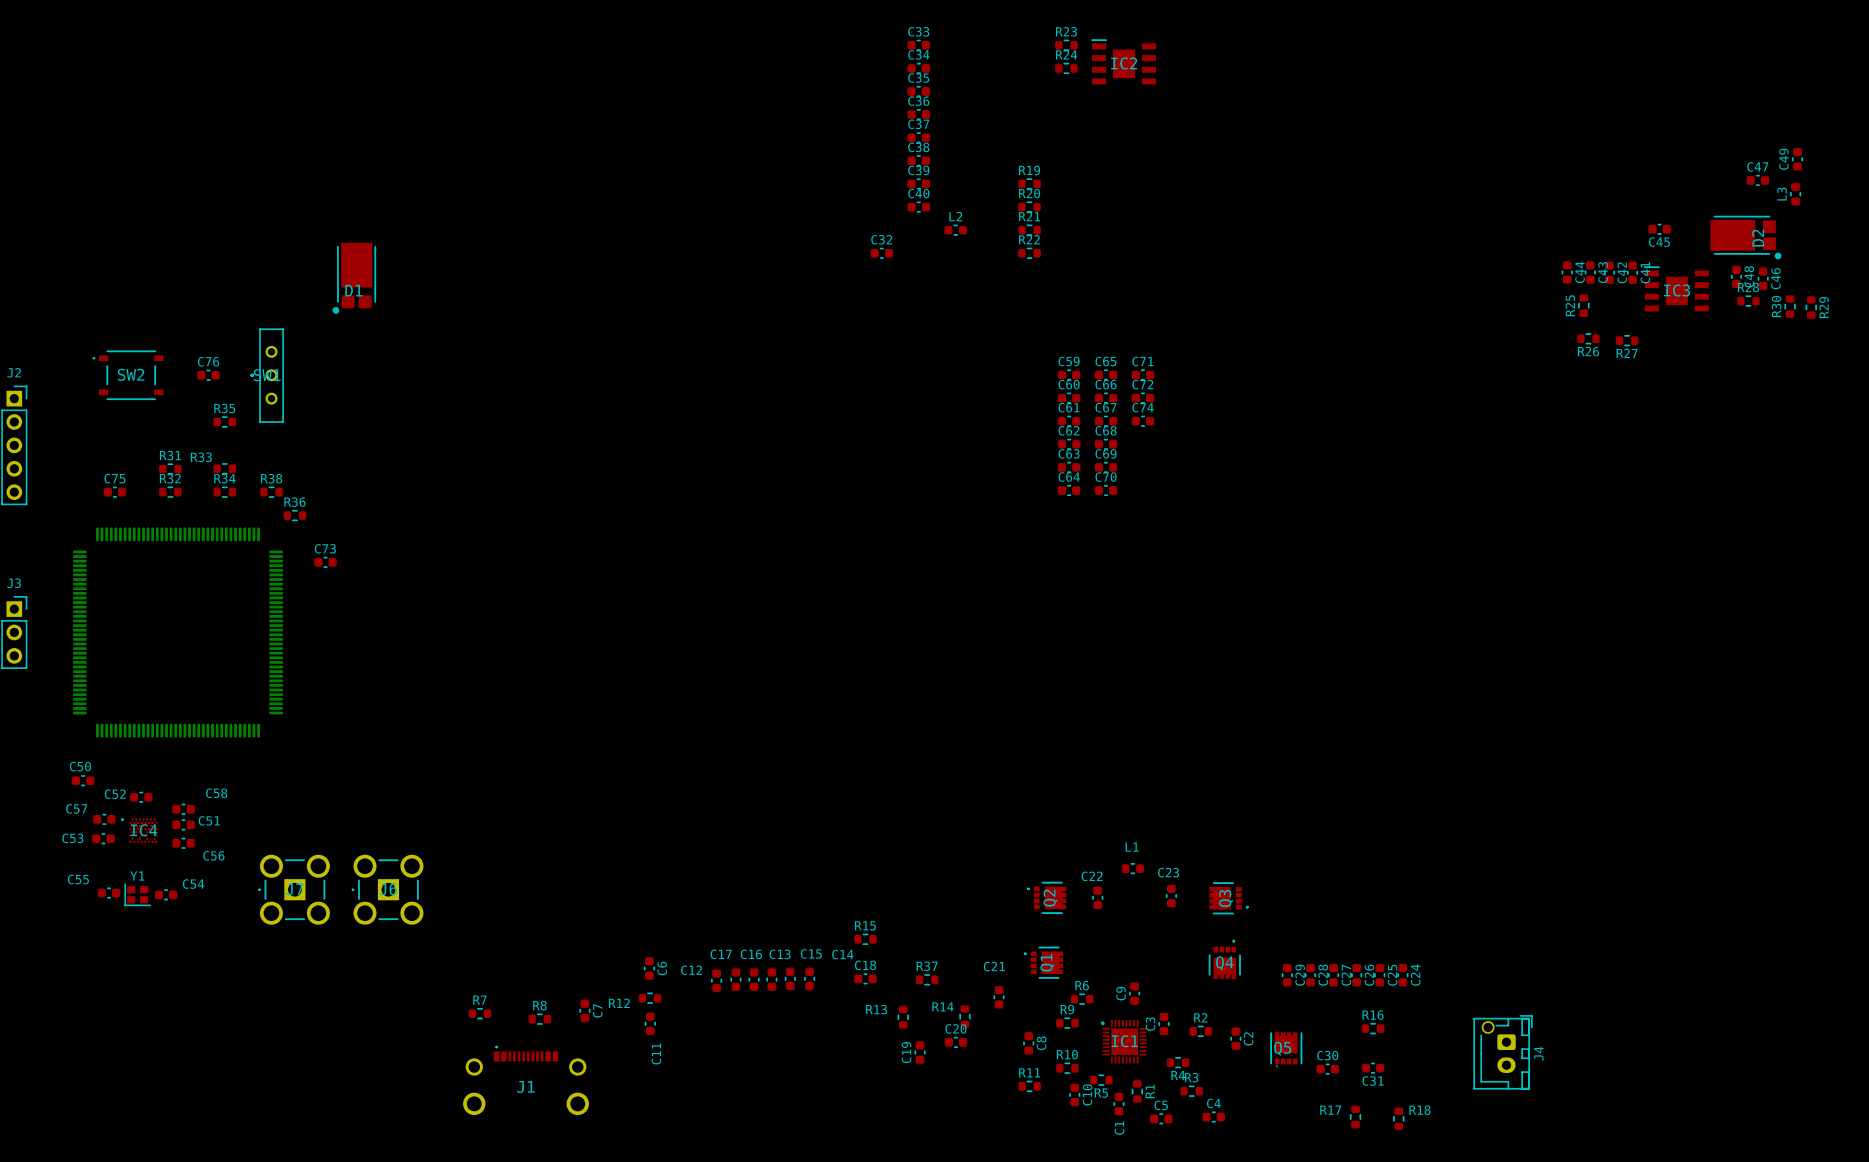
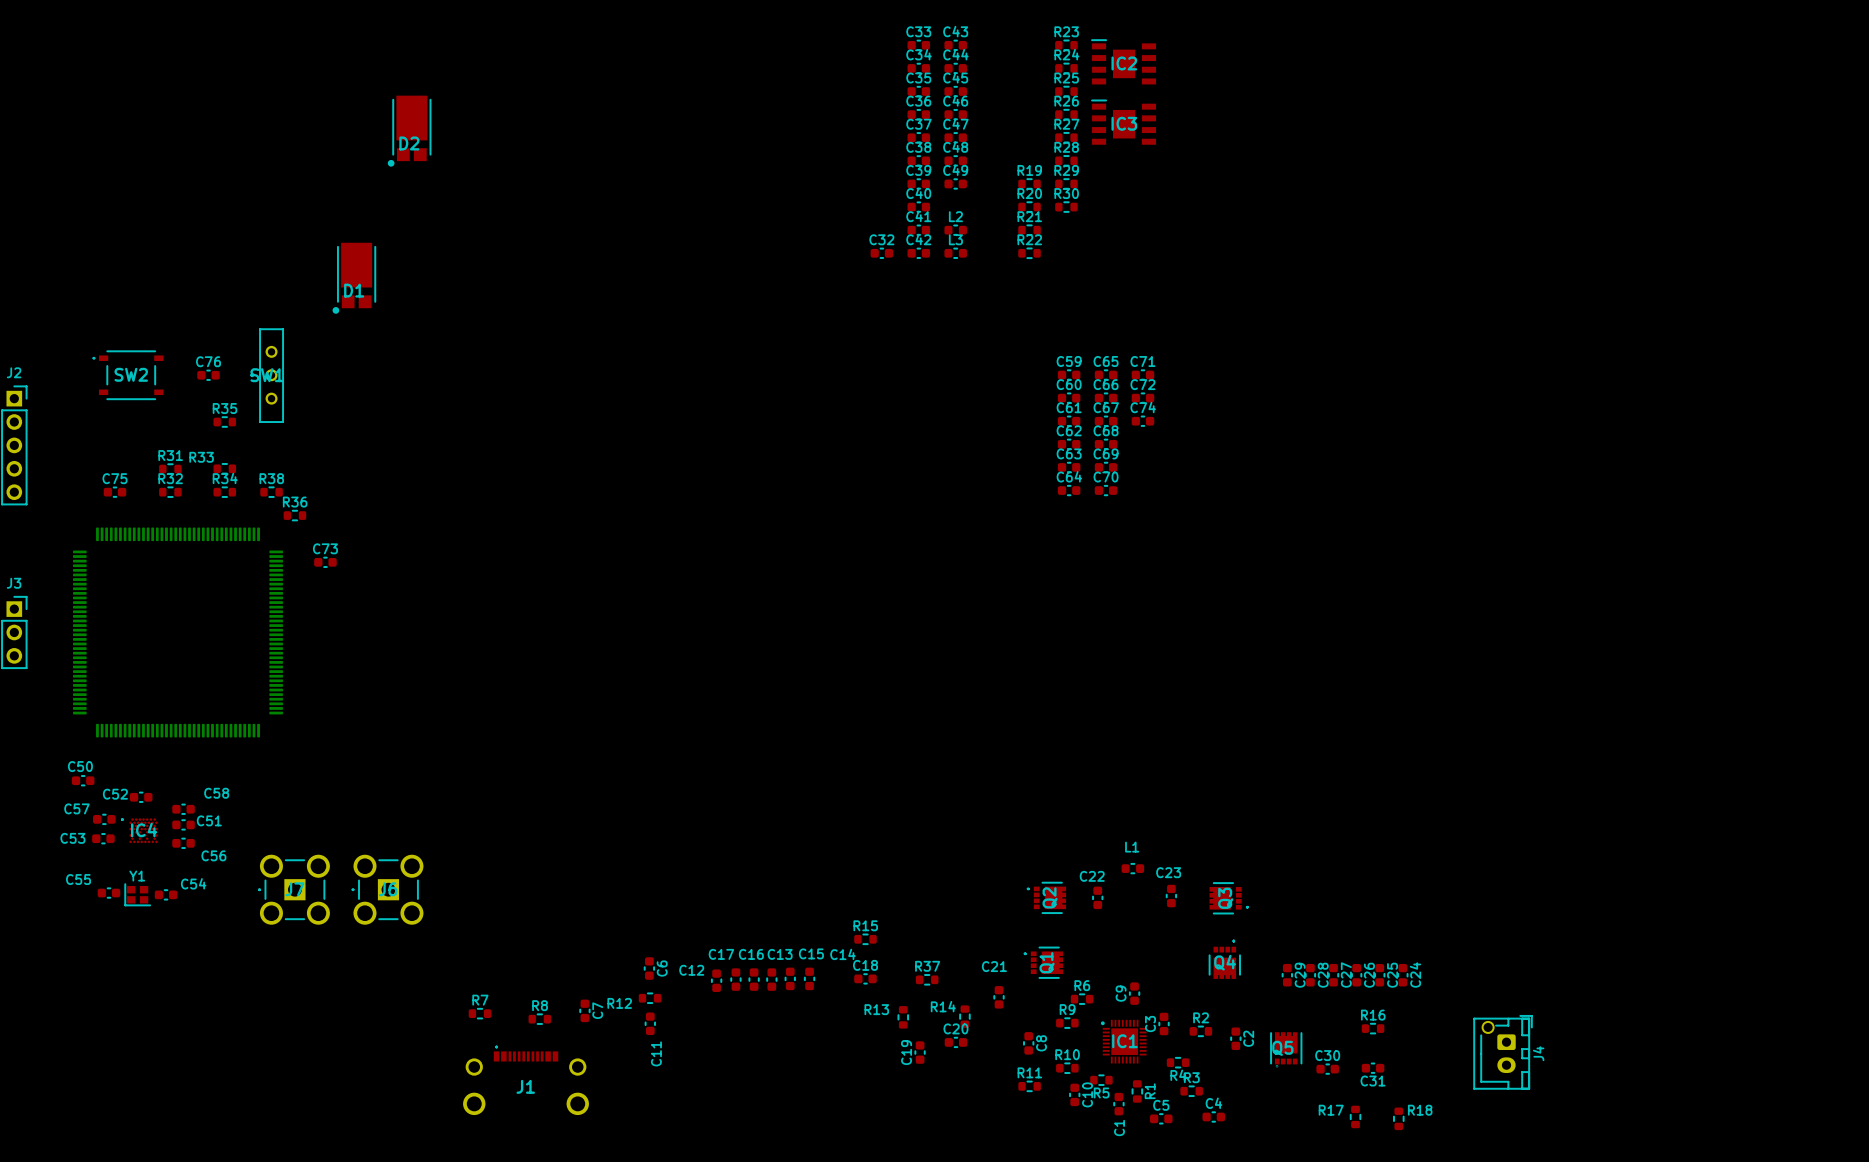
C49 rotation: 0° (1797, 159) -> 90° clockwise (955, 183)
C49 position: (1797, 159) -> (955, 183)
C47 position: (1757, 180) -> (955, 137)
L3 rotation: 0° (1795, 194) -> 90° clockwise (955, 253)
L3 position: (1795, 194) -> (955, 253)
C45 position: (1659, 229) -> (955, 91)
D2 rotation: 0° (1745, 237) -> 90° clockwise (409, 131)
D2 position: (1745, 237) -> (409, 131)
C45 name position: C45 (1659, 242) -> C45 (955, 77)
C44 rotation: 0° (1567, 272) -> 90° clockwise (955, 68)
C44 position: (1567, 272) -> (955, 68)
C44 name position: C44 (1580, 272) -> C44 (955, 54)
C43 rotation: 0° (1590, 272) -> 90° clockwise (955, 45)
C43 position: (1590, 272) -> (955, 45)
C43 name position: C43 (1603, 272) -> C43 (955, 31)
C42 rotation: 0° (1609, 272) -> 90° clockwise (918, 253)
C42 position: (1609, 272) -> (918, 253)
C42 name position: C42 (1622, 272) -> C42 (918, 239)
C41 rotation: 0° (1632, 272) -> 90° clockwise (918, 230)
C41 position: (1632, 272) -> (918, 230)
C41 name position: C41 (1645, 272) -> C41 (918, 216)
C48 rotation: 0° (1736, 276) -> 90° clockwise (955, 160)
C48 position: (1736, 276) -> (955, 160)
C48 name position: C48 (1749, 276) -> C48 (955, 147)
C46 rotation: 0° (1763, 278) -> 90° clockwise (955, 114)
C46 position: (1763, 278) -> (955, 114)
C46 name position: C46 (1775, 278) -> C46 (955, 100)
IC3 position: (1676, 288) -> (1123, 122)
R28 position: (1748, 301) -> (1066, 160)
R25 rotation: 0° (1583, 305) -> 90° clockwise (1066, 91)
R25 position: (1583, 305) -> (1066, 91)
R30 rotation: 0° (1790, 306) -> 90° clockwise (1066, 207)
R30 position: (1790, 306) -> (1066, 207)
R29 rotation: 0° (1811, 307) -> 90° clockwise (1066, 183)
R29 position: (1811, 307) -> (1066, 183)
R29 name position: R29 (1824, 307) -> R29 (1066, 170)
R26 position: (1588, 338) -> (1066, 114)
R27 position: (1627, 340) -> (1066, 137)
R26 name position: R26 (1588, 351) -> R26 (1066, 101)
R27 name position: R27 (1627, 353) -> R27 (1066, 124)

